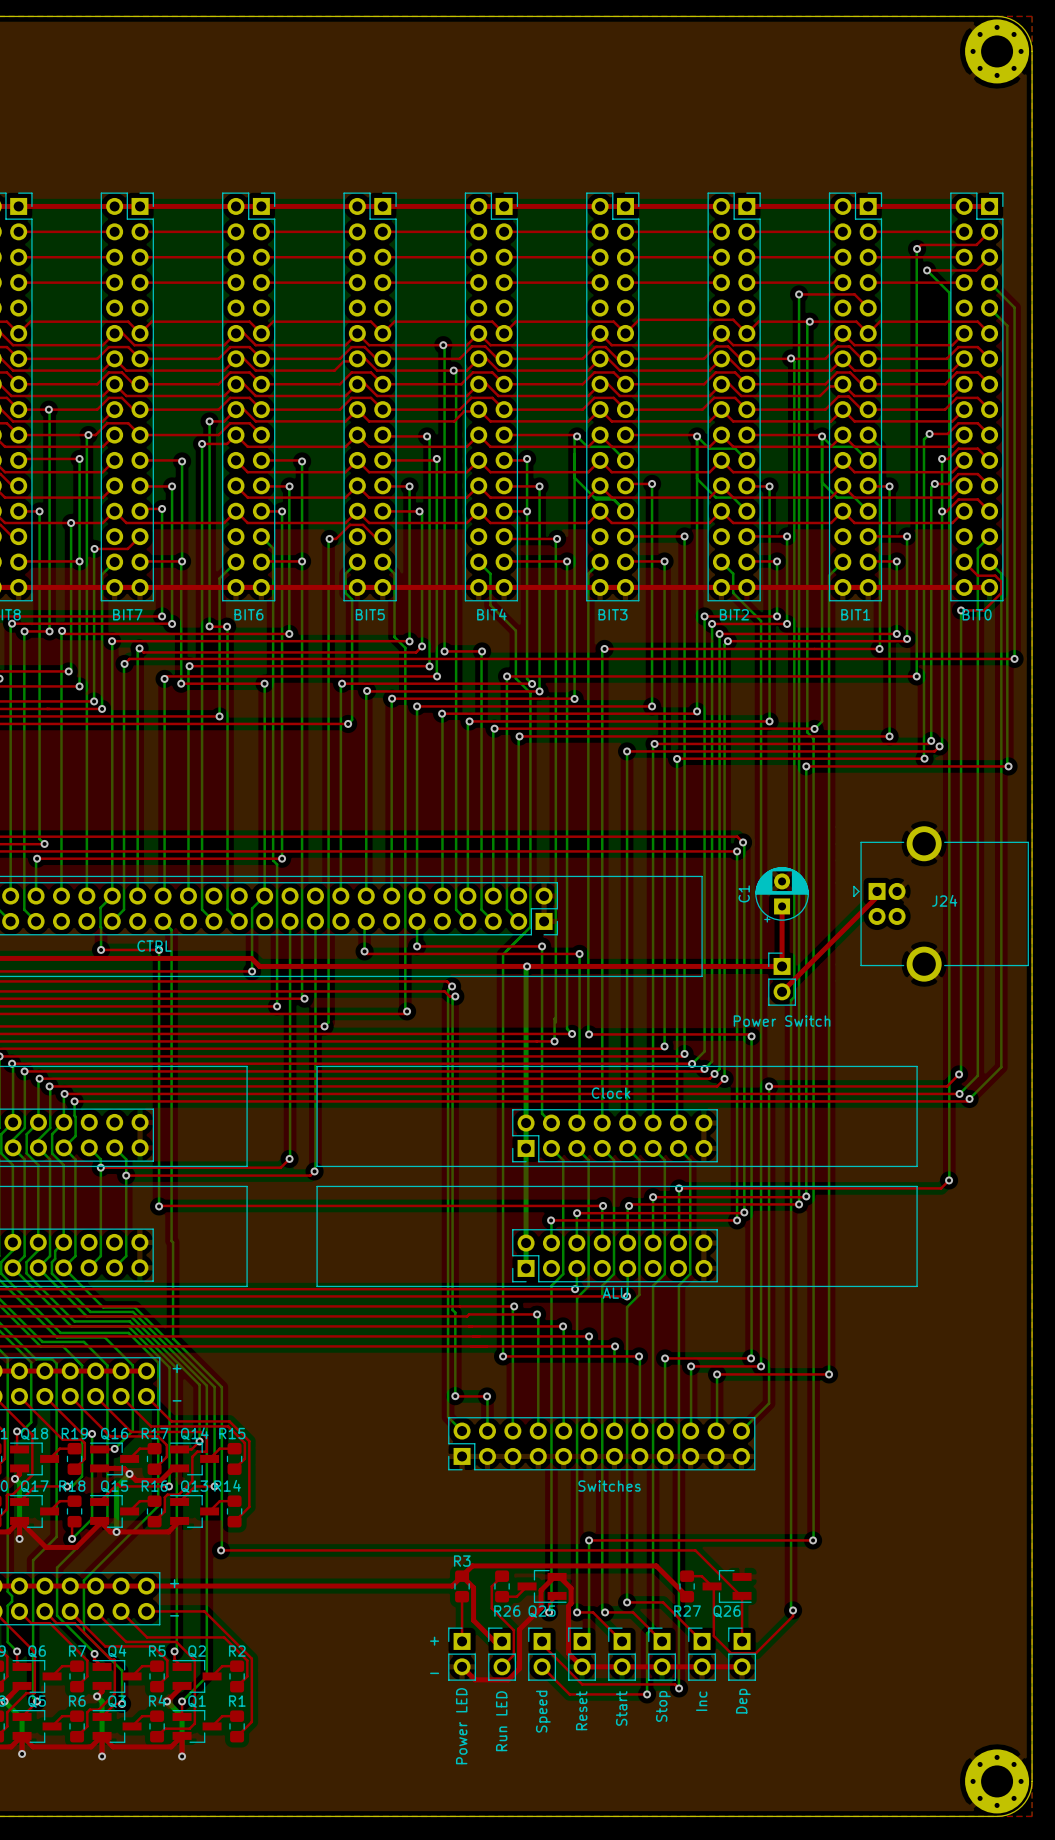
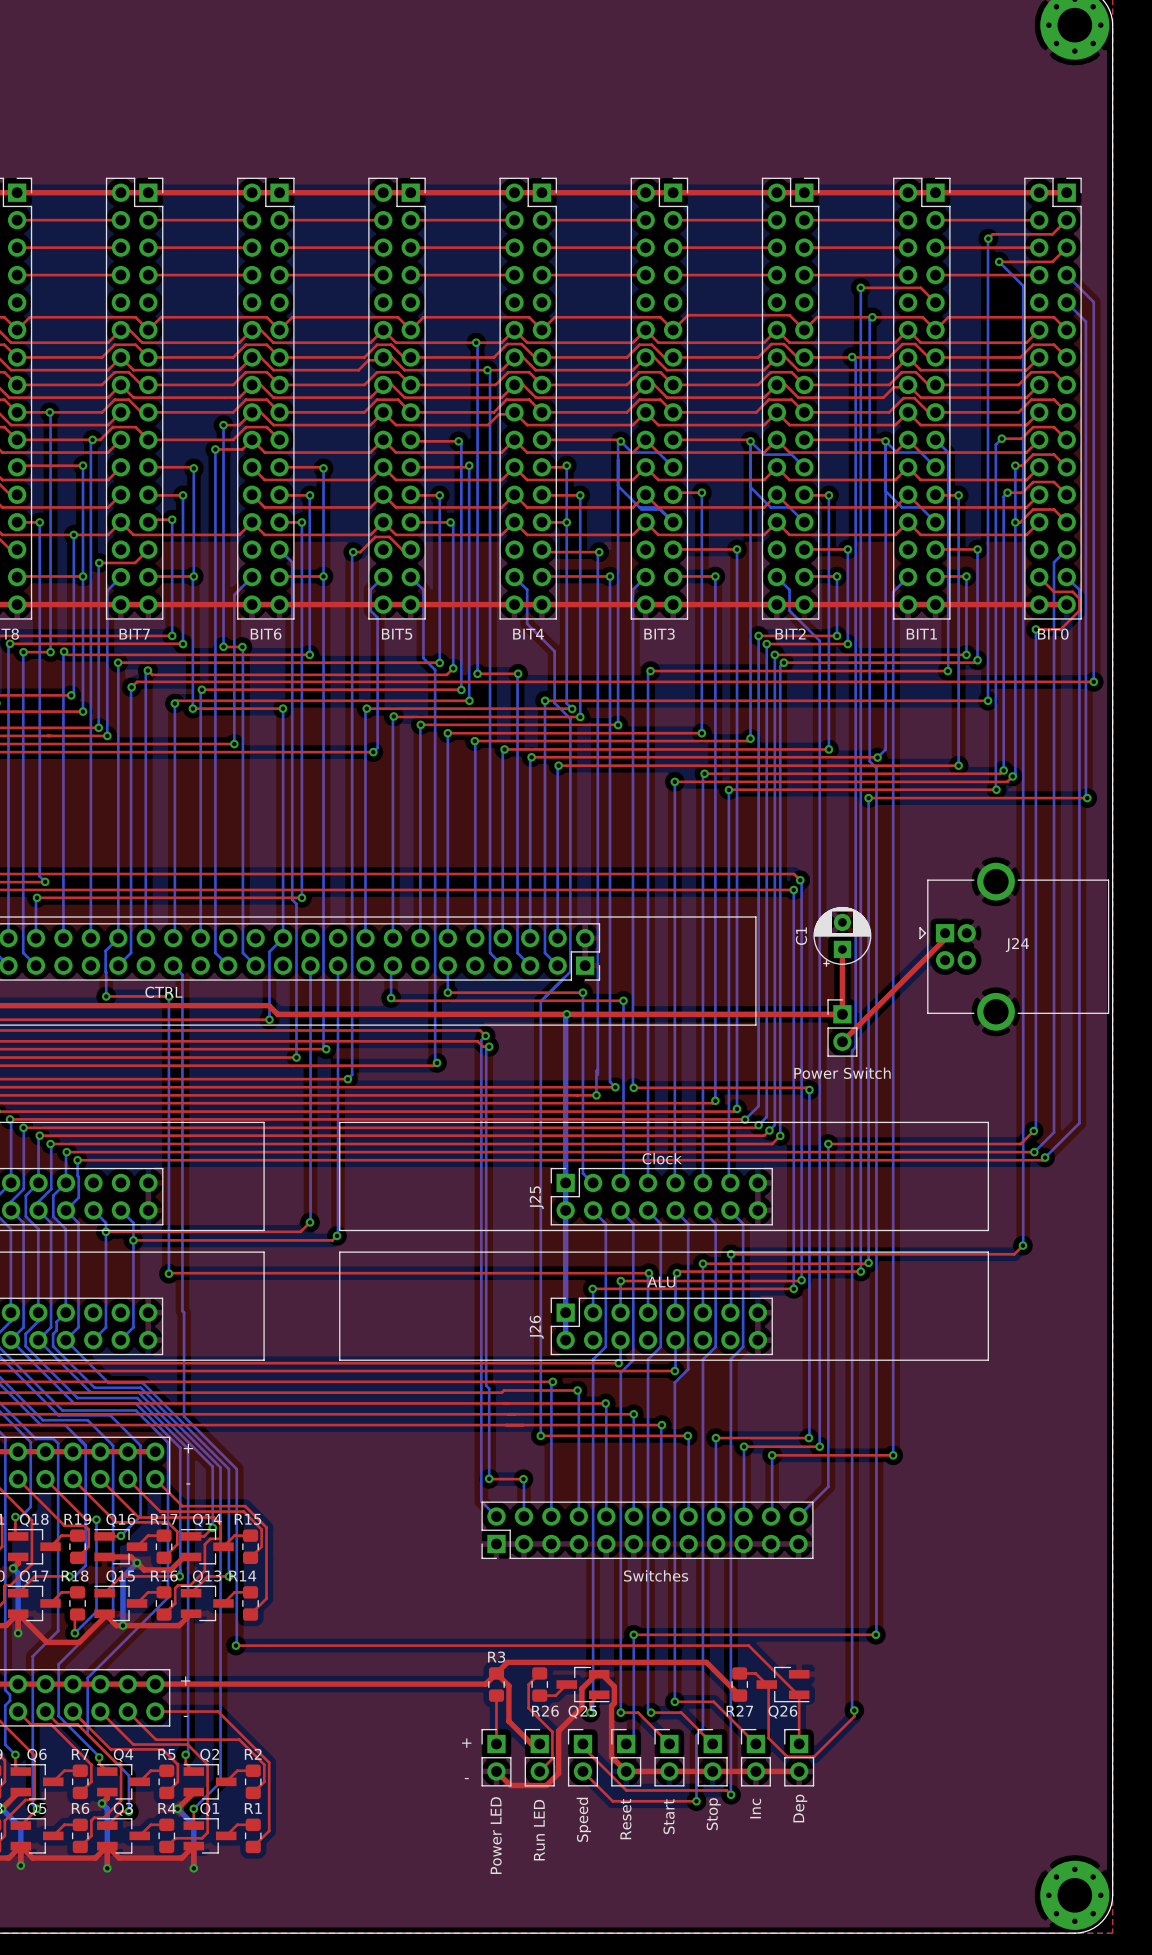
part: Clock (614, 1135) -> none
J25: none -> Clock (661, 1196)
part: ALU (614, 1255) -> none
J26: none -> ALU (661, 1326)

